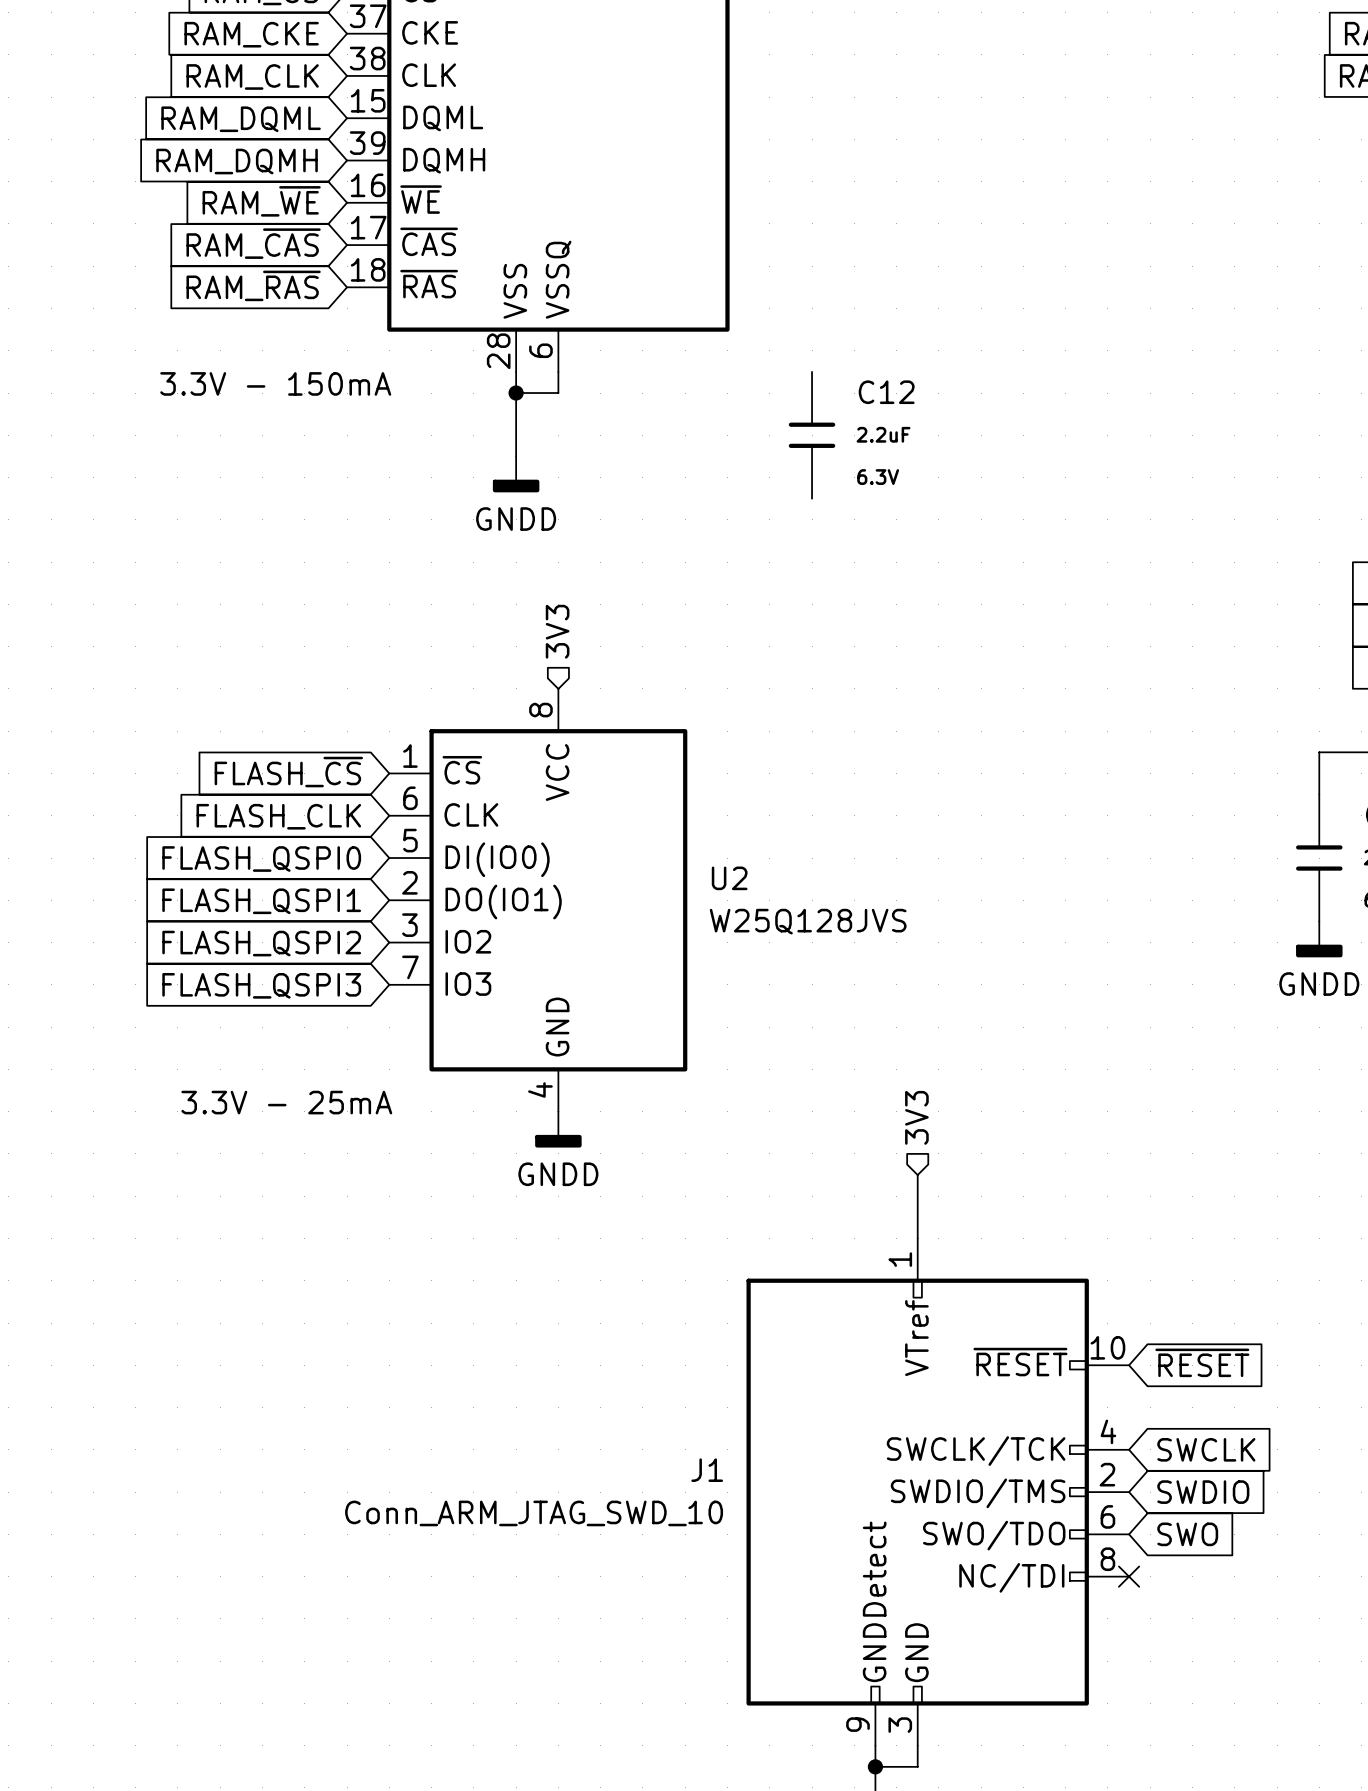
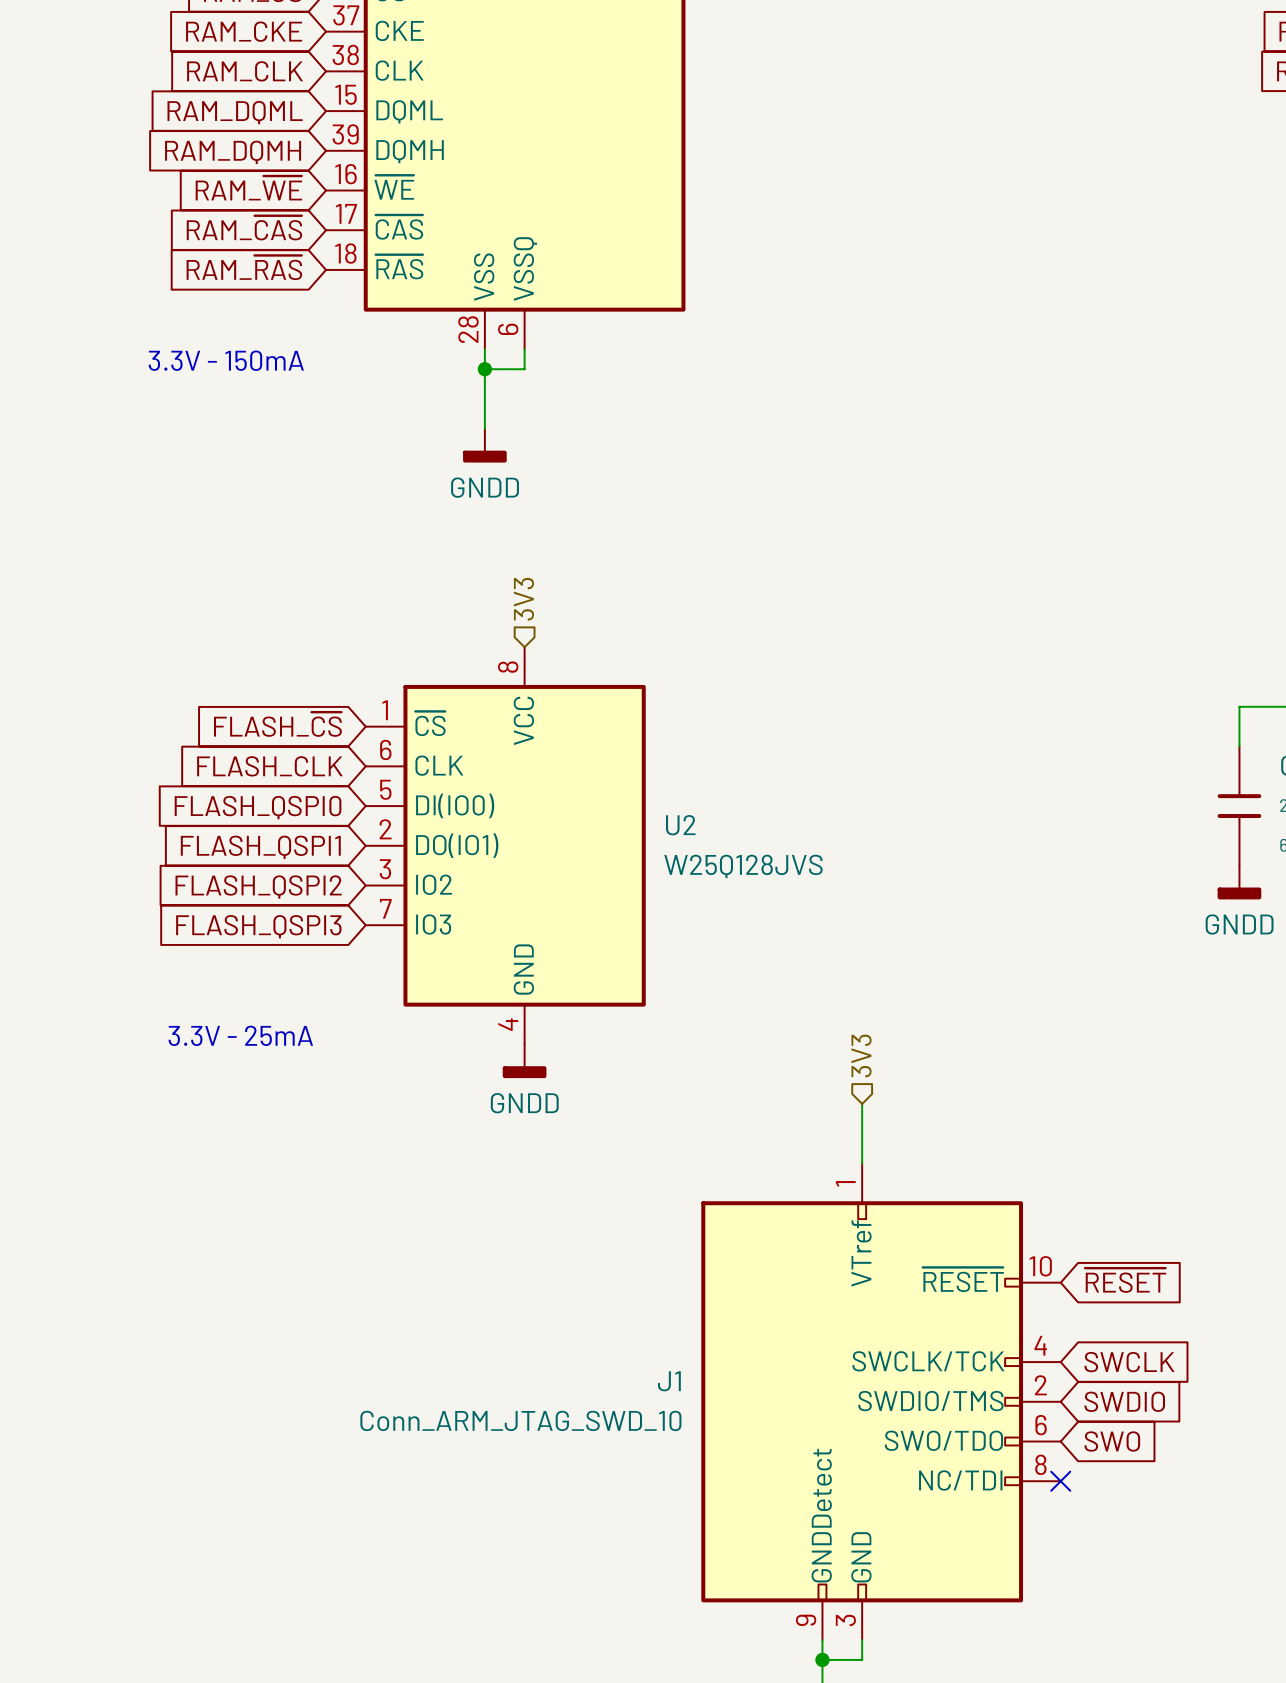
C12: 2.2uF (812, 435) -> none

